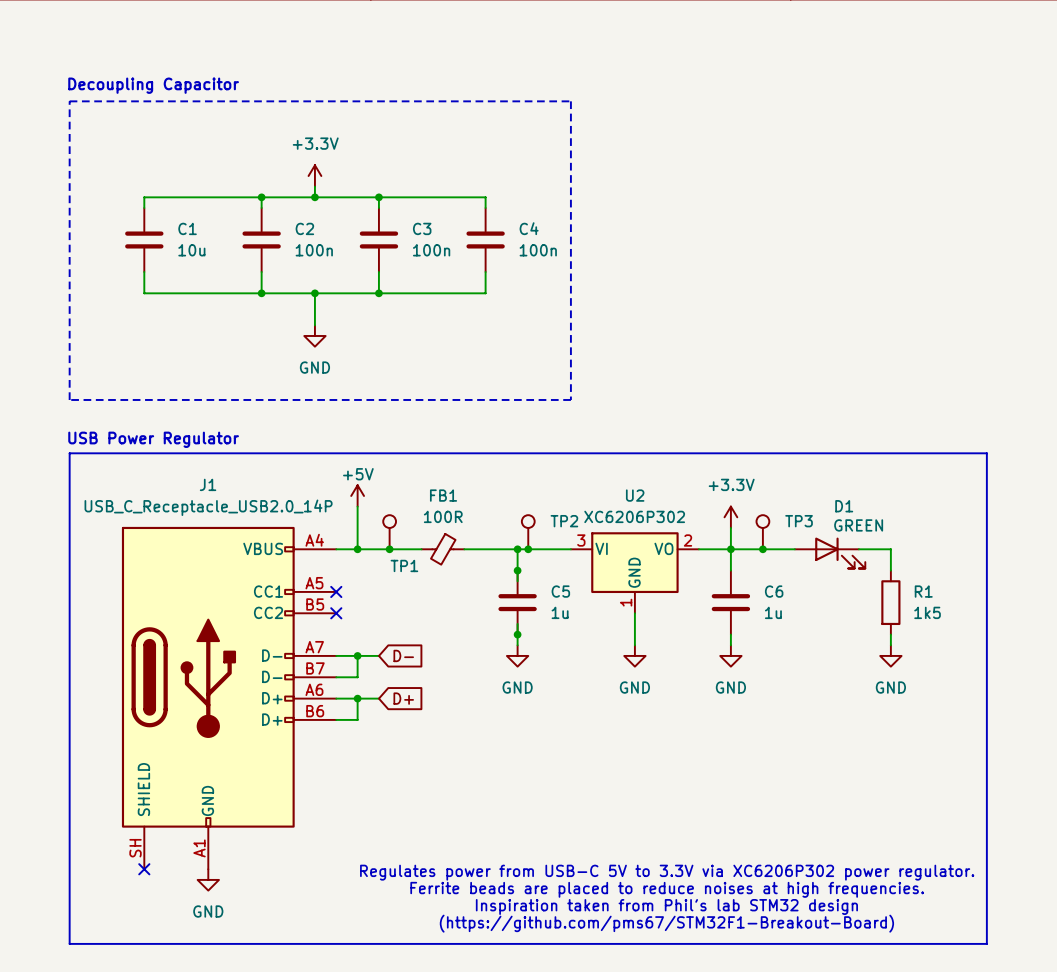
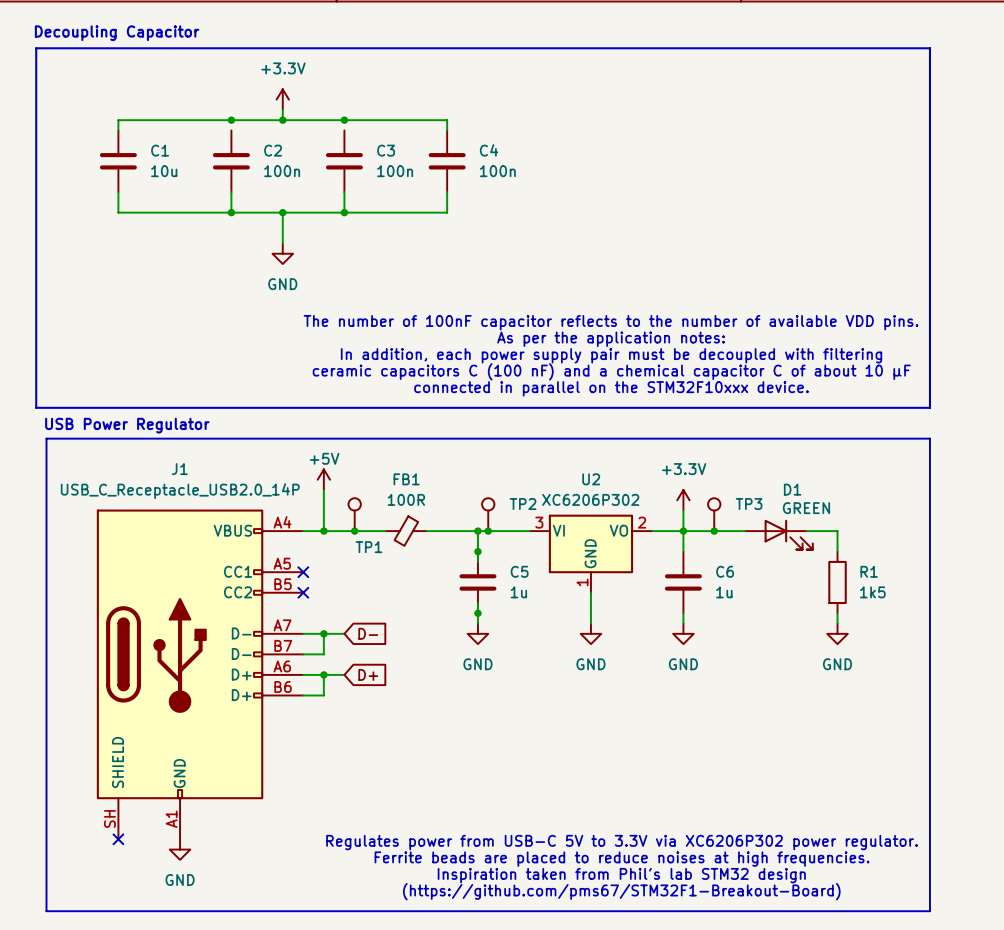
line: none -> (36, 48) (929, 48) (929, 407) (36, 407) (36, 48)
text position: Decoupling Capacitor (153, 85) -> Decoupling Capacitor (117, 33)
line: (69, 101) (570, 101) (570, 399) (69, 399) (69, 101) -> none
junction: none -> (231, 120)
junction: none -> (282, 120)
junction: none -> (344, 120)
wire: none -> (118, 130) (118, 120) (447, 120) (447, 130)
power symbol position: +3.3V (314, 176) -> +3.3V (282, 99)
wire: (314, 186) (314, 197) -> (282, 109) (282, 120)
wire: (144, 197) (485, 197) -> none
junction position: (261, 197) -> (231, 212)
junction position: (314, 197) -> (282, 212)
junction position: (378, 197) -> (344, 212)
wire: none -> (118, 202) (118, 212) (447, 212) (447, 202)
C1 position: (144, 240) -> (118, 161)
C2 position: (261, 240) -> (231, 161)
C3 position: (378, 240) -> (344, 161)
C4 position: (485, 240) -> (447, 161)
wire: (144, 271) (144, 293) (485, 293) (485, 271) -> none
wire: (261, 271) (261, 293) -> none
wire: (378, 271) (378, 293) -> none
junction: (261, 293) -> none
wire: (314, 293) (314, 325) -> (282, 212) (282, 243)
junction: (314, 293) -> none
junction: (378, 293) -> none
text: none -> The number of 100nF capacitor reflects to the number of available VDD pins. (611, 322)
power symbol position: GND (314, 335) -> GND (282, 253)
text: none -> As per the application notes: (611, 339)
text: none -> In addition, each power supply pair must be decoupled with filtering (611, 355)
text: none -> ceramic capacitors C (100 nF) and a chemical capacitor C of about 10 μF (611, 371)
text: none -> connected in parallel on the STM32F10xxx device. (611, 388)

